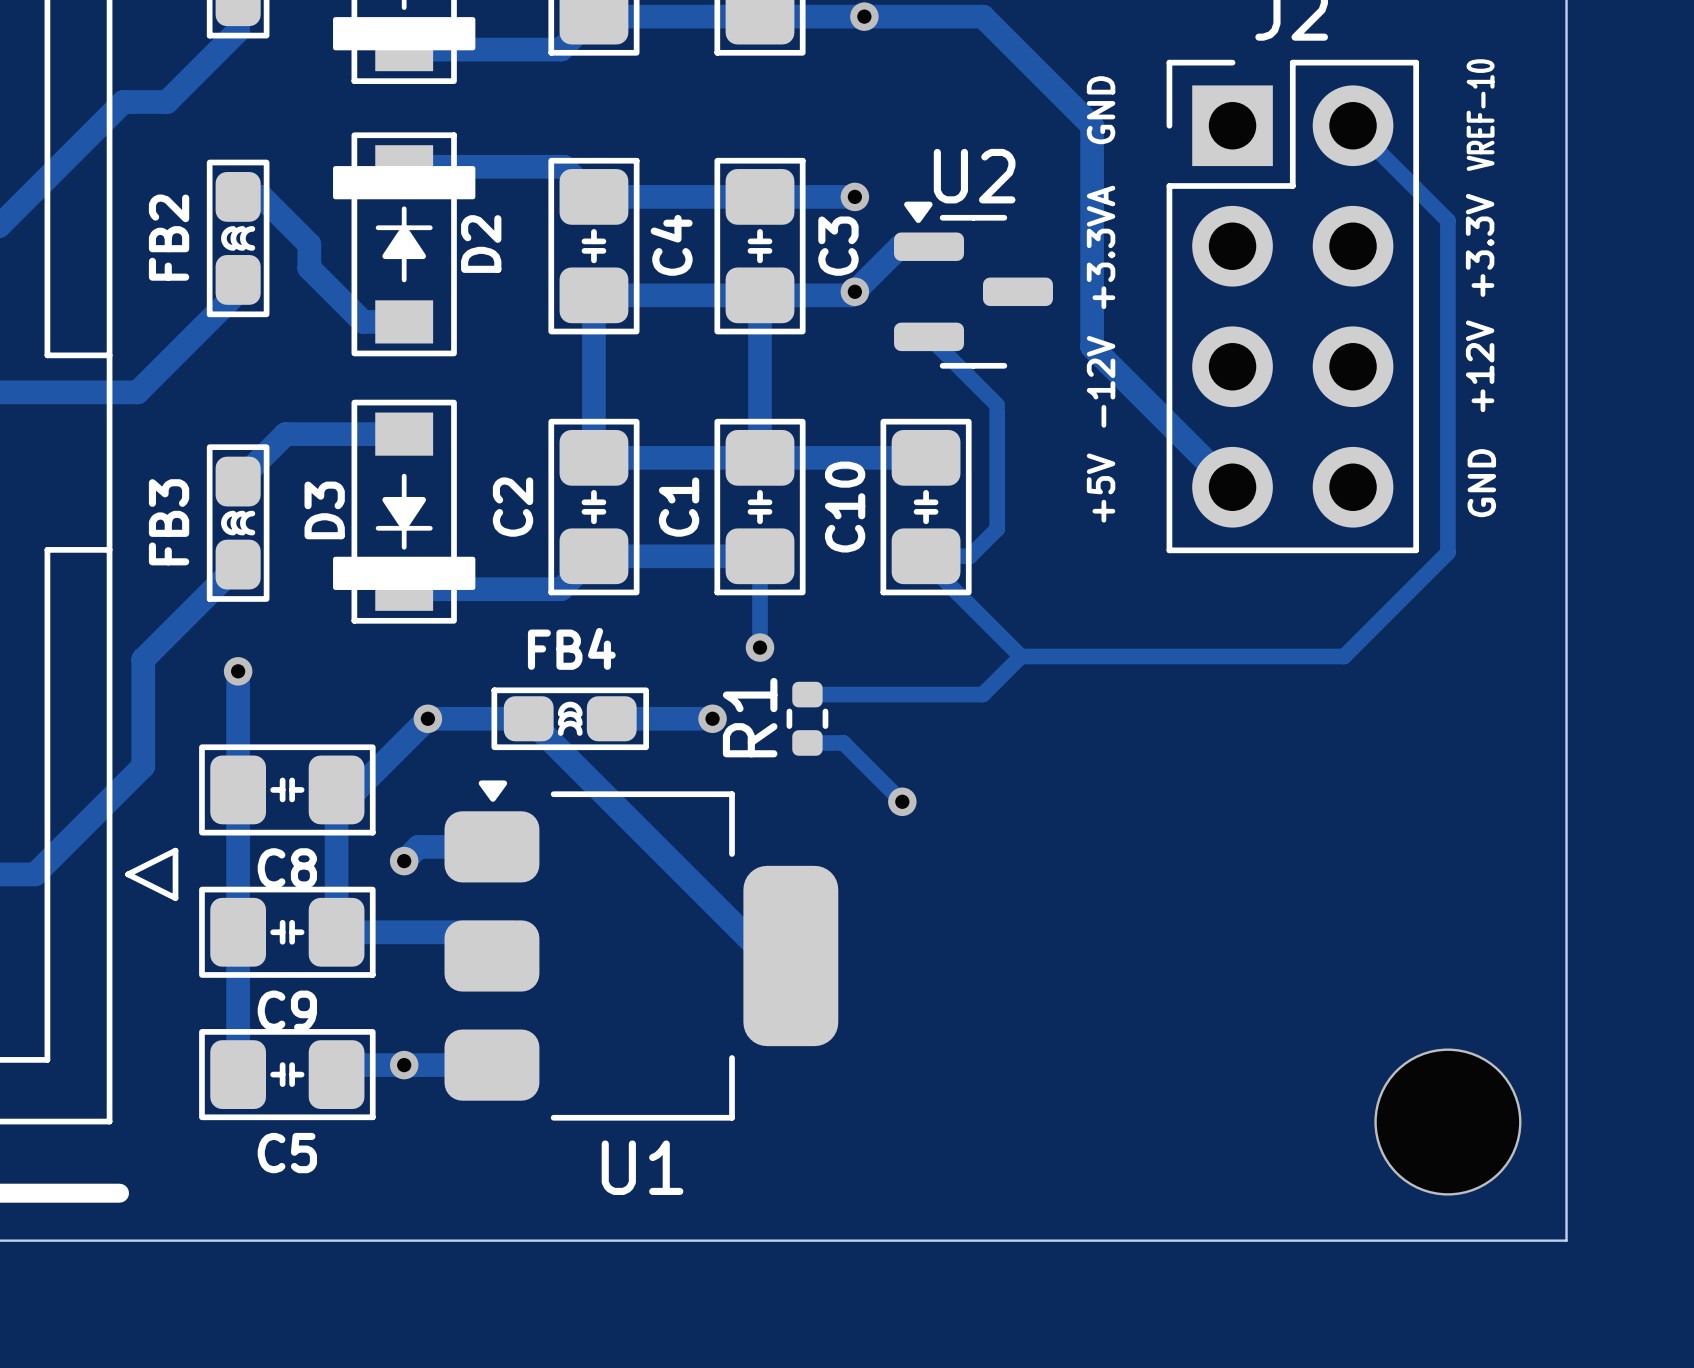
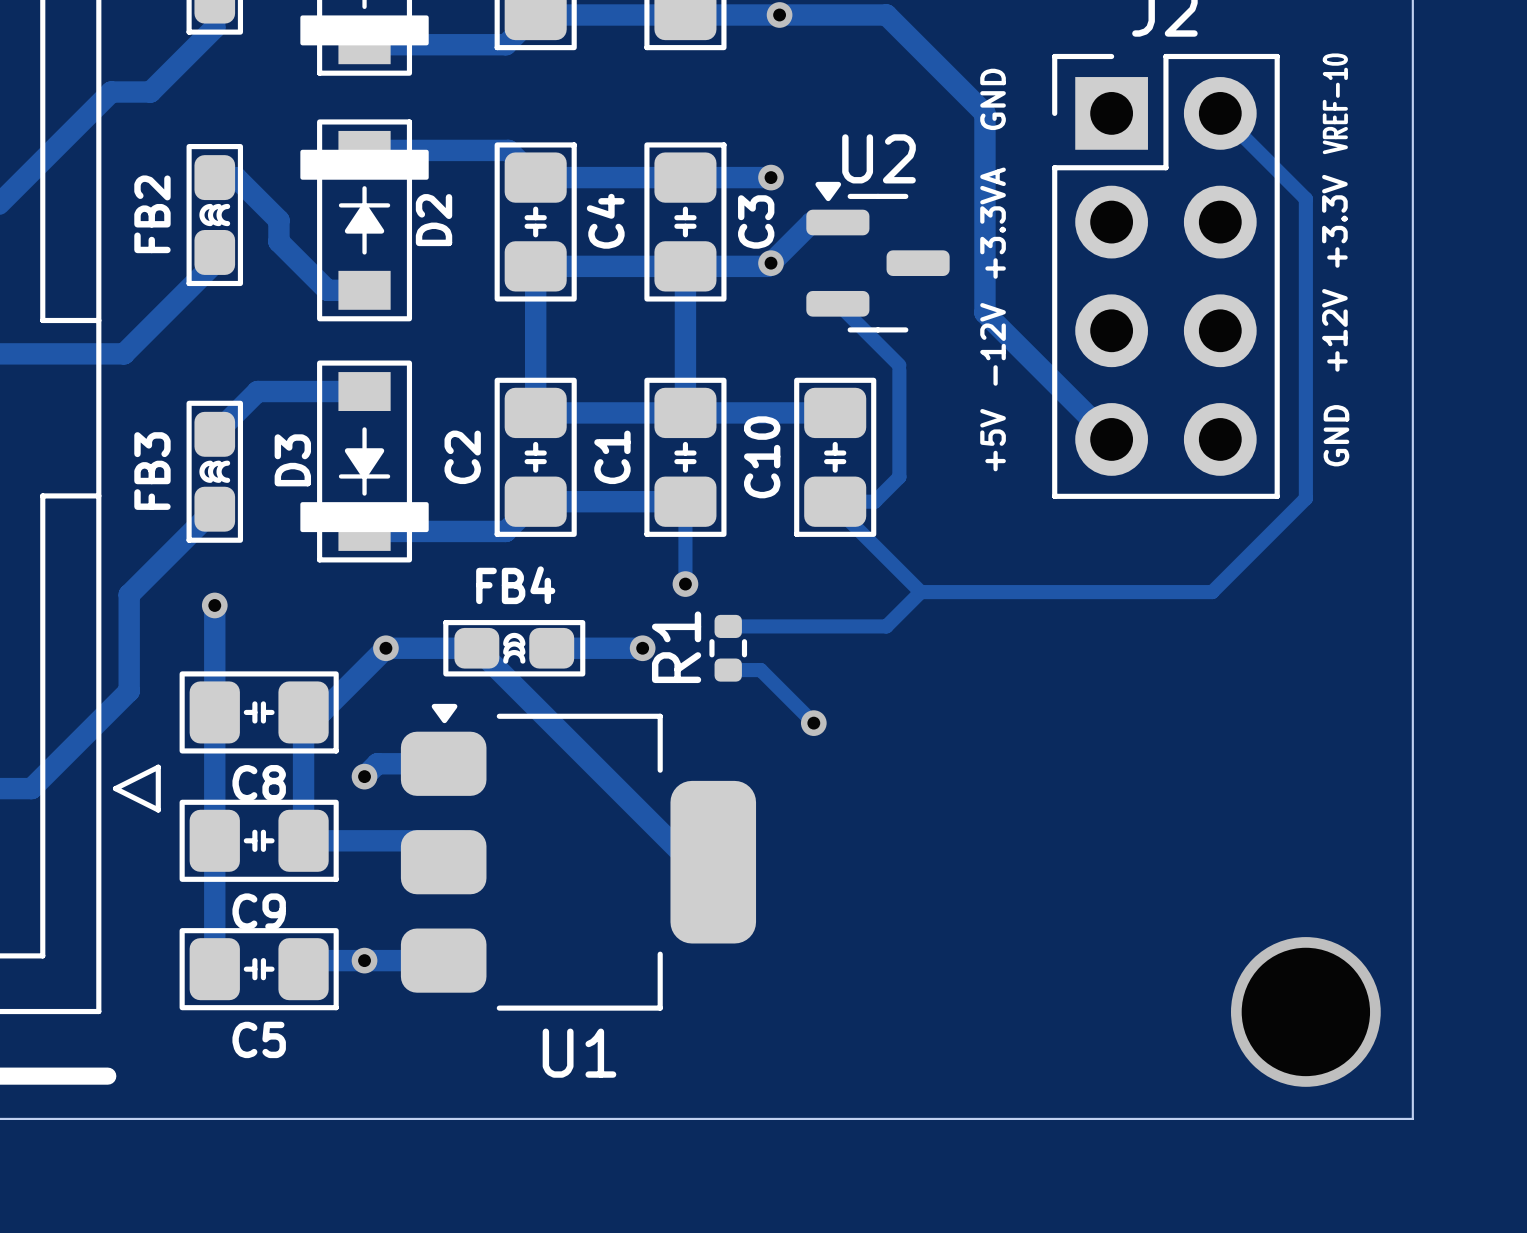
via size: [1374, 1048, 1522, 1196] -> [1230, 937, 1381, 1087]

